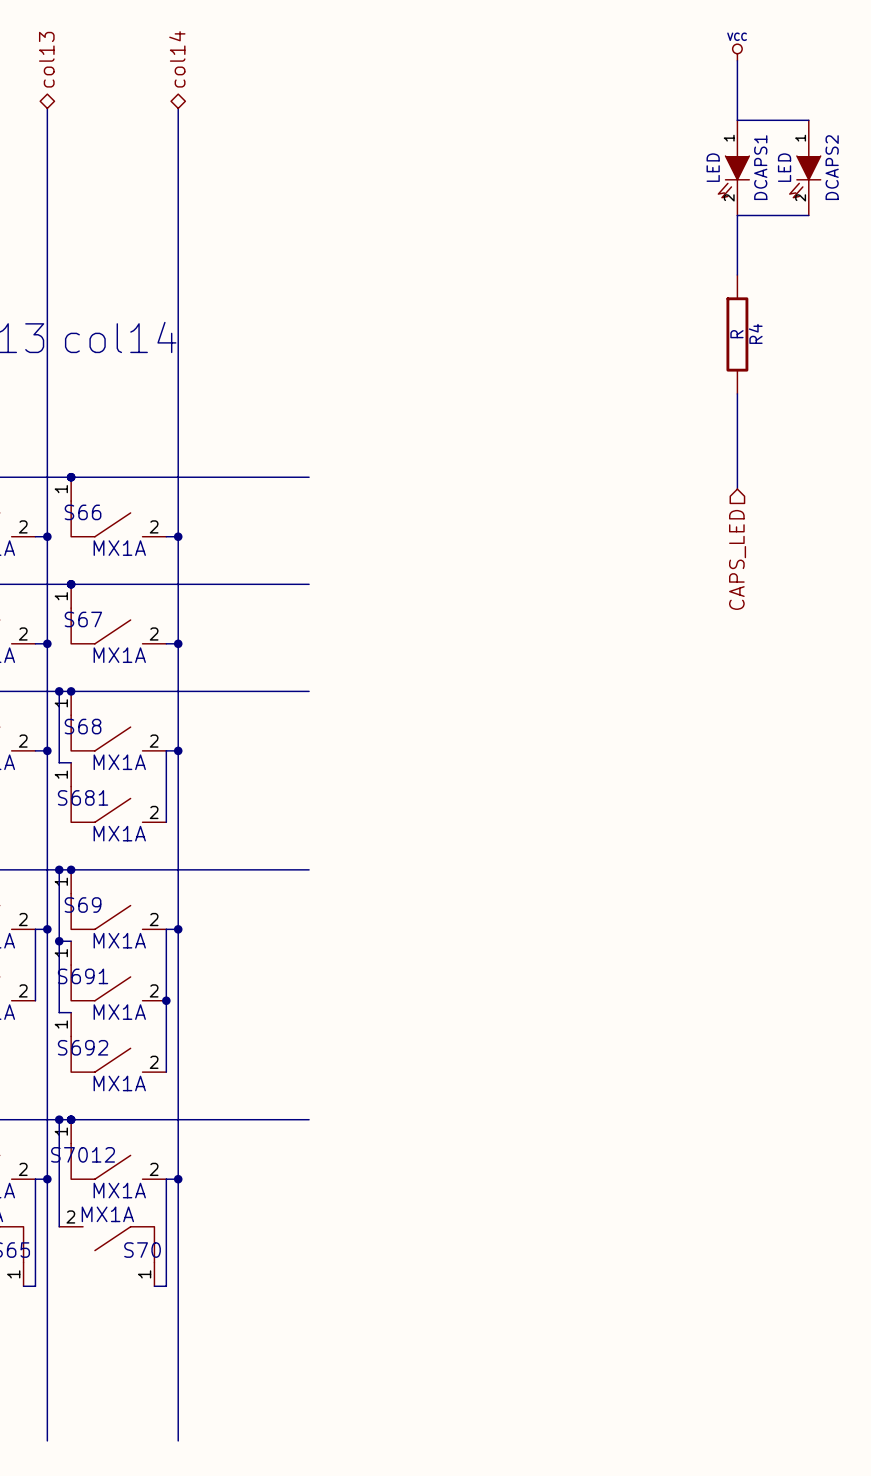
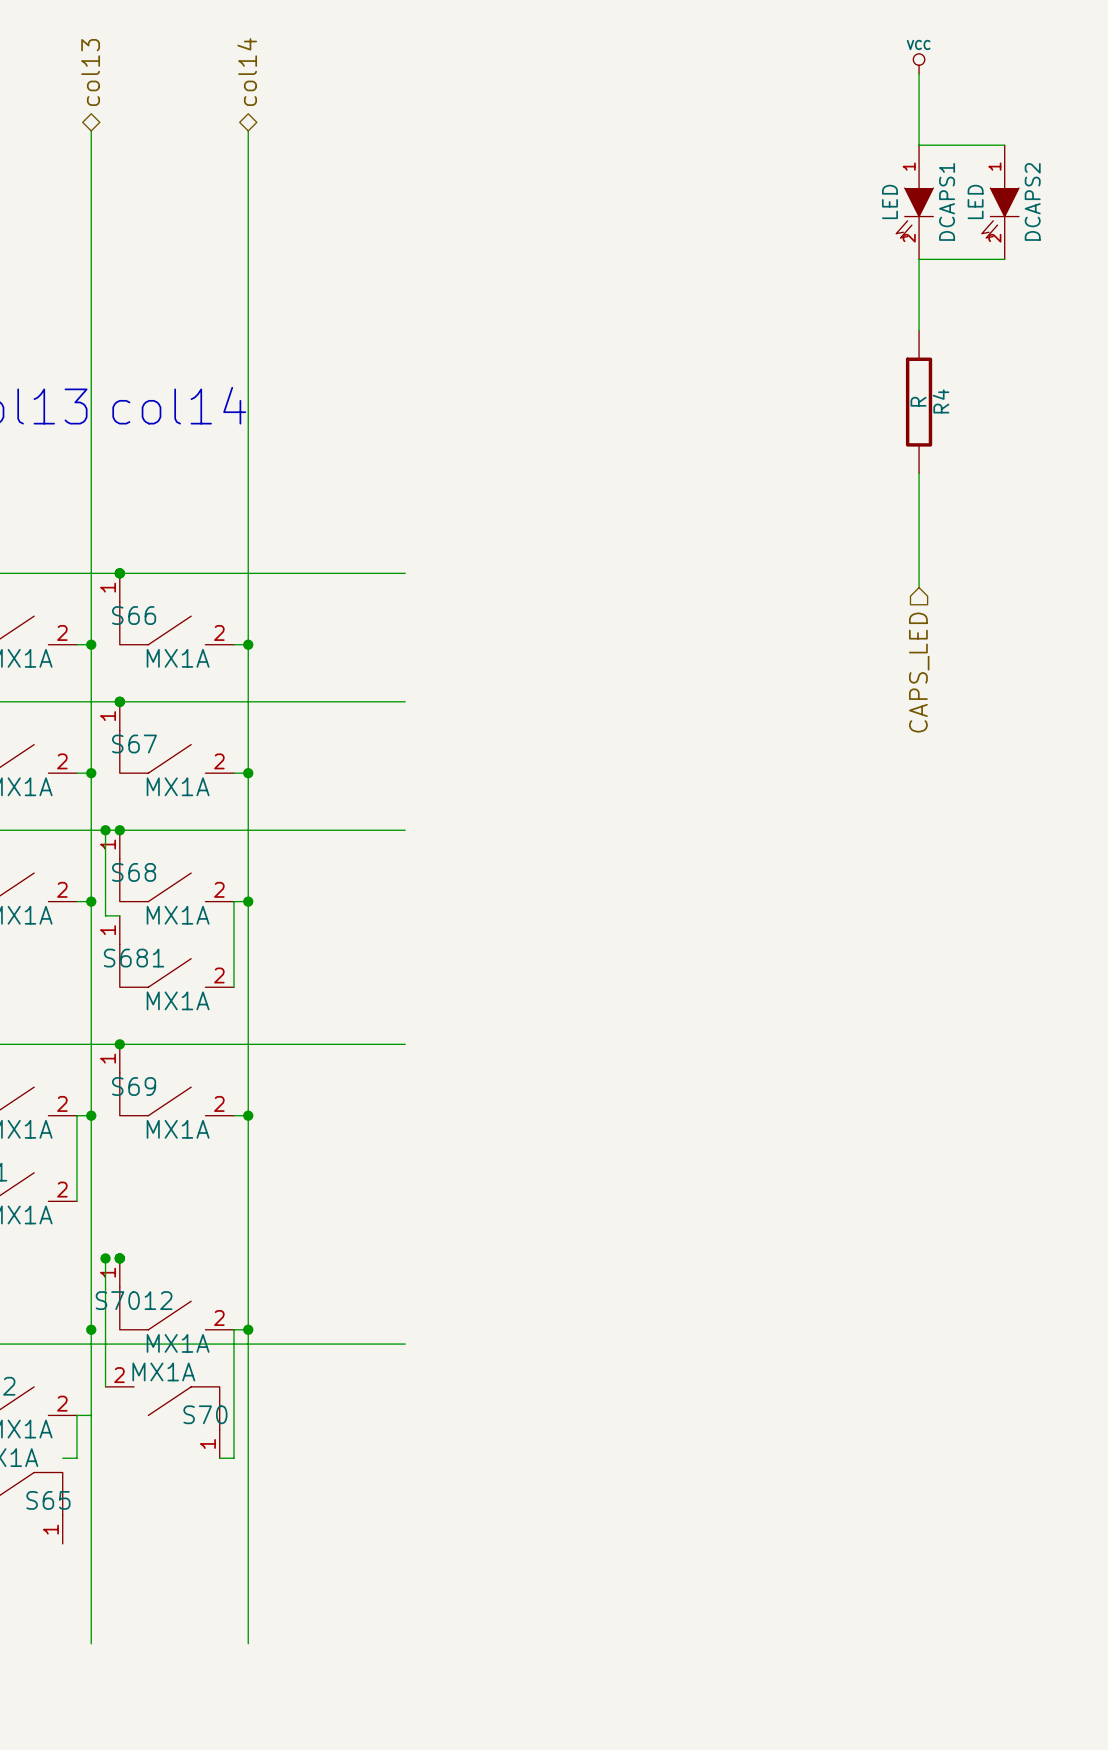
wire: (59, 869) (59, 1012) (71, 1012) -> none
junction: (59, 869) -> none
wire: (166, 929) (166, 1072) -> none
wire: (59, 941) (71, 941) -> none
junction: (59, 941) -> none
S691: MX1A (118, 970) -> none
junction: (166, 1000) -> none
S692: MX1A (118, 1042) -> none
junction: none -> (105, 1258)
junction: none -> (119, 1258)
junction: none -> (91, 1329)
junction: none -> (248, 1329)
junction: (59, 1119) -> none
junction: (71, 1119) -> none
S7012 position: (118, 1149) -> (176, 1294)
wire: (59, 1155) (59, 1226) -> (105, 1258) (105, 1344)
junction: (47, 1179) -> none
wire: (166, 1179) (178, 1179) -> (233, 1415) (233, 1329) (248, 1329)
junction: (178, 1179) -> none
wire: (35, 1214) (35, 1286) (23, 1286) -> (76, 1458) (62, 1458)
wire: (166, 1214) (166, 1286) (154, 1286) -> (233, 1458) (219, 1458)
S70 position: (106, 1256) -> (162, 1422)
wire: (47, 1369) (47, 1440) -> none
wire: (178, 1369) (178, 1440) -> none

